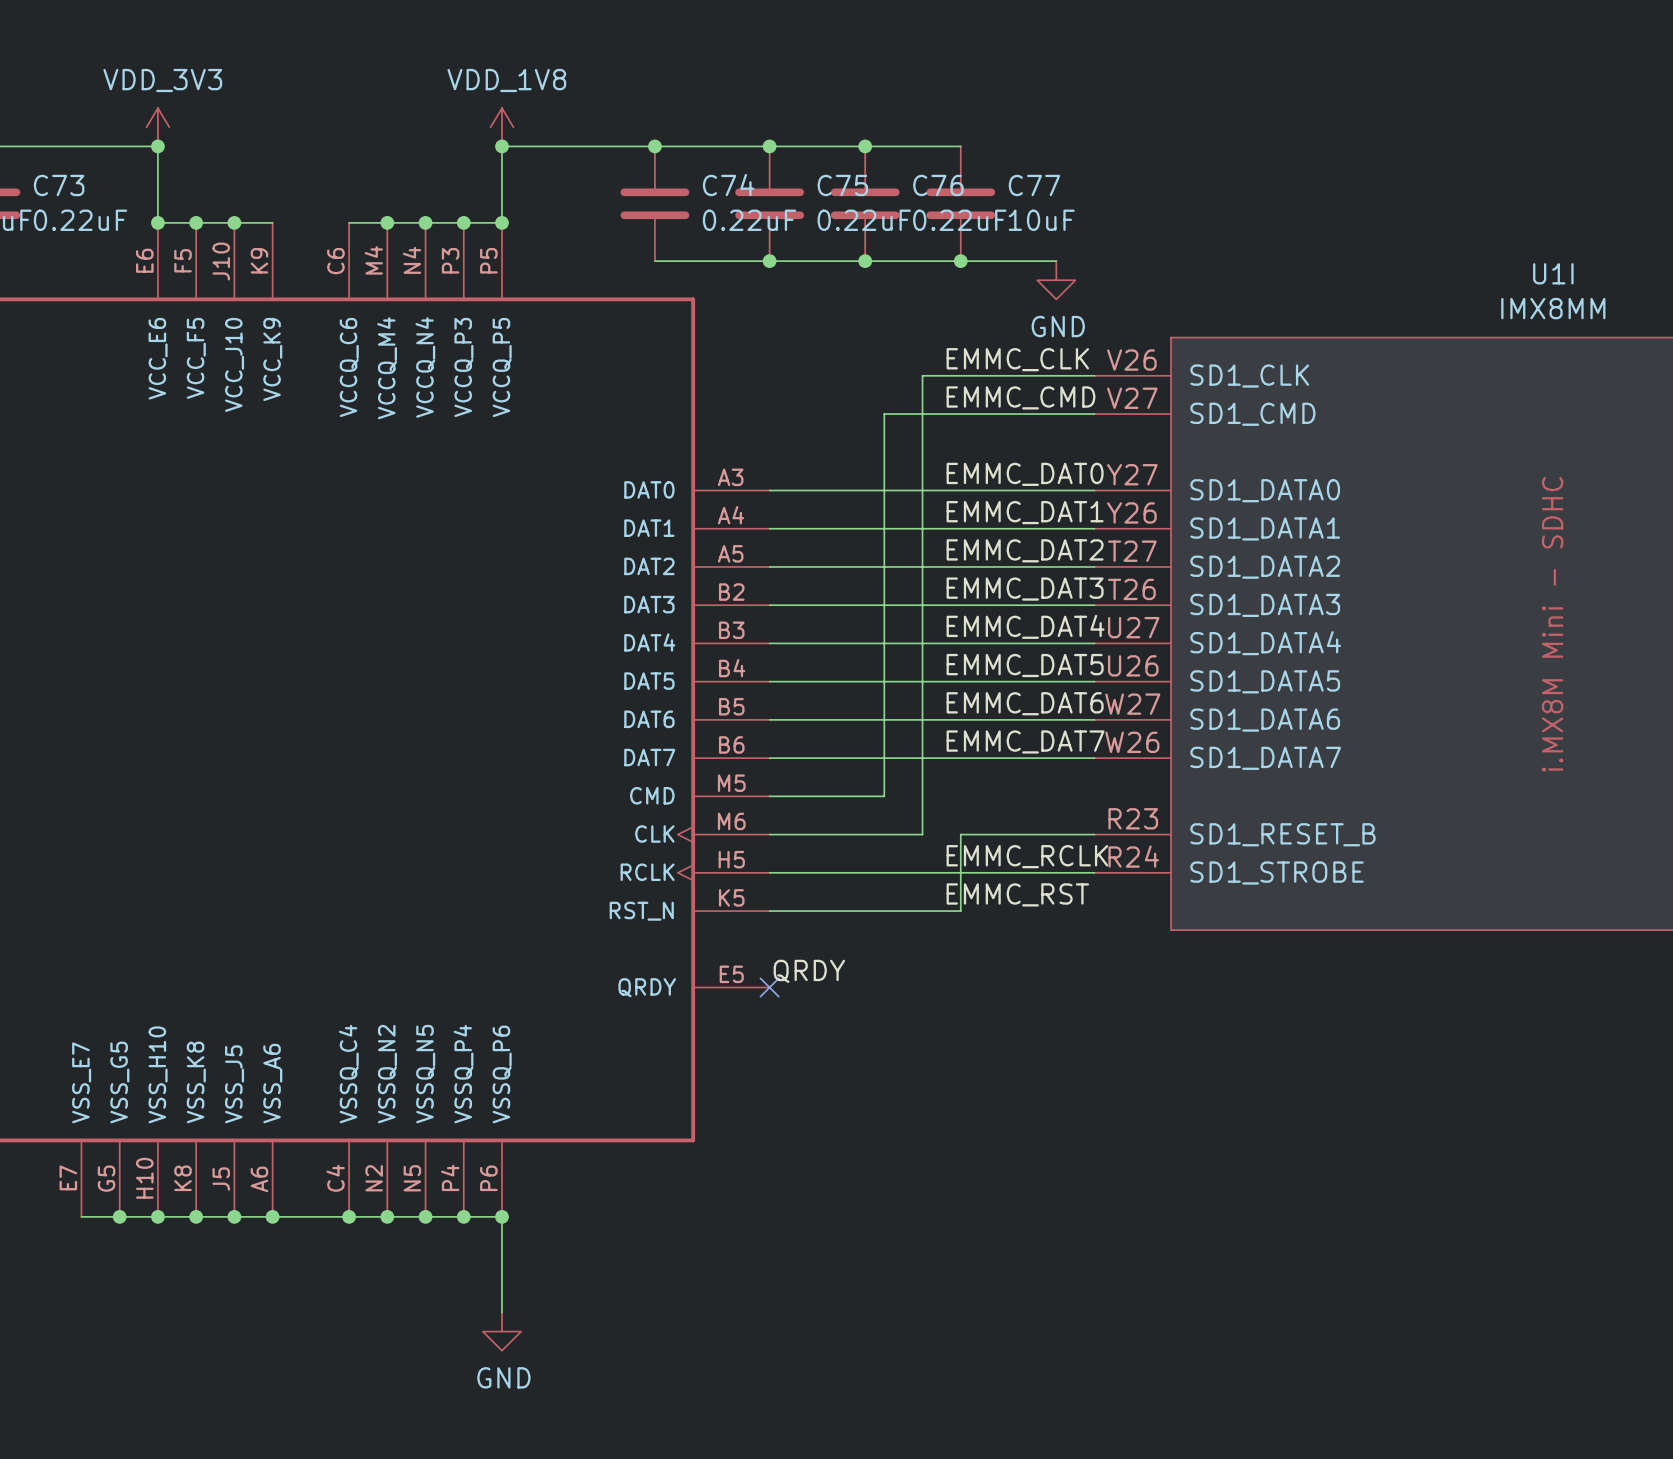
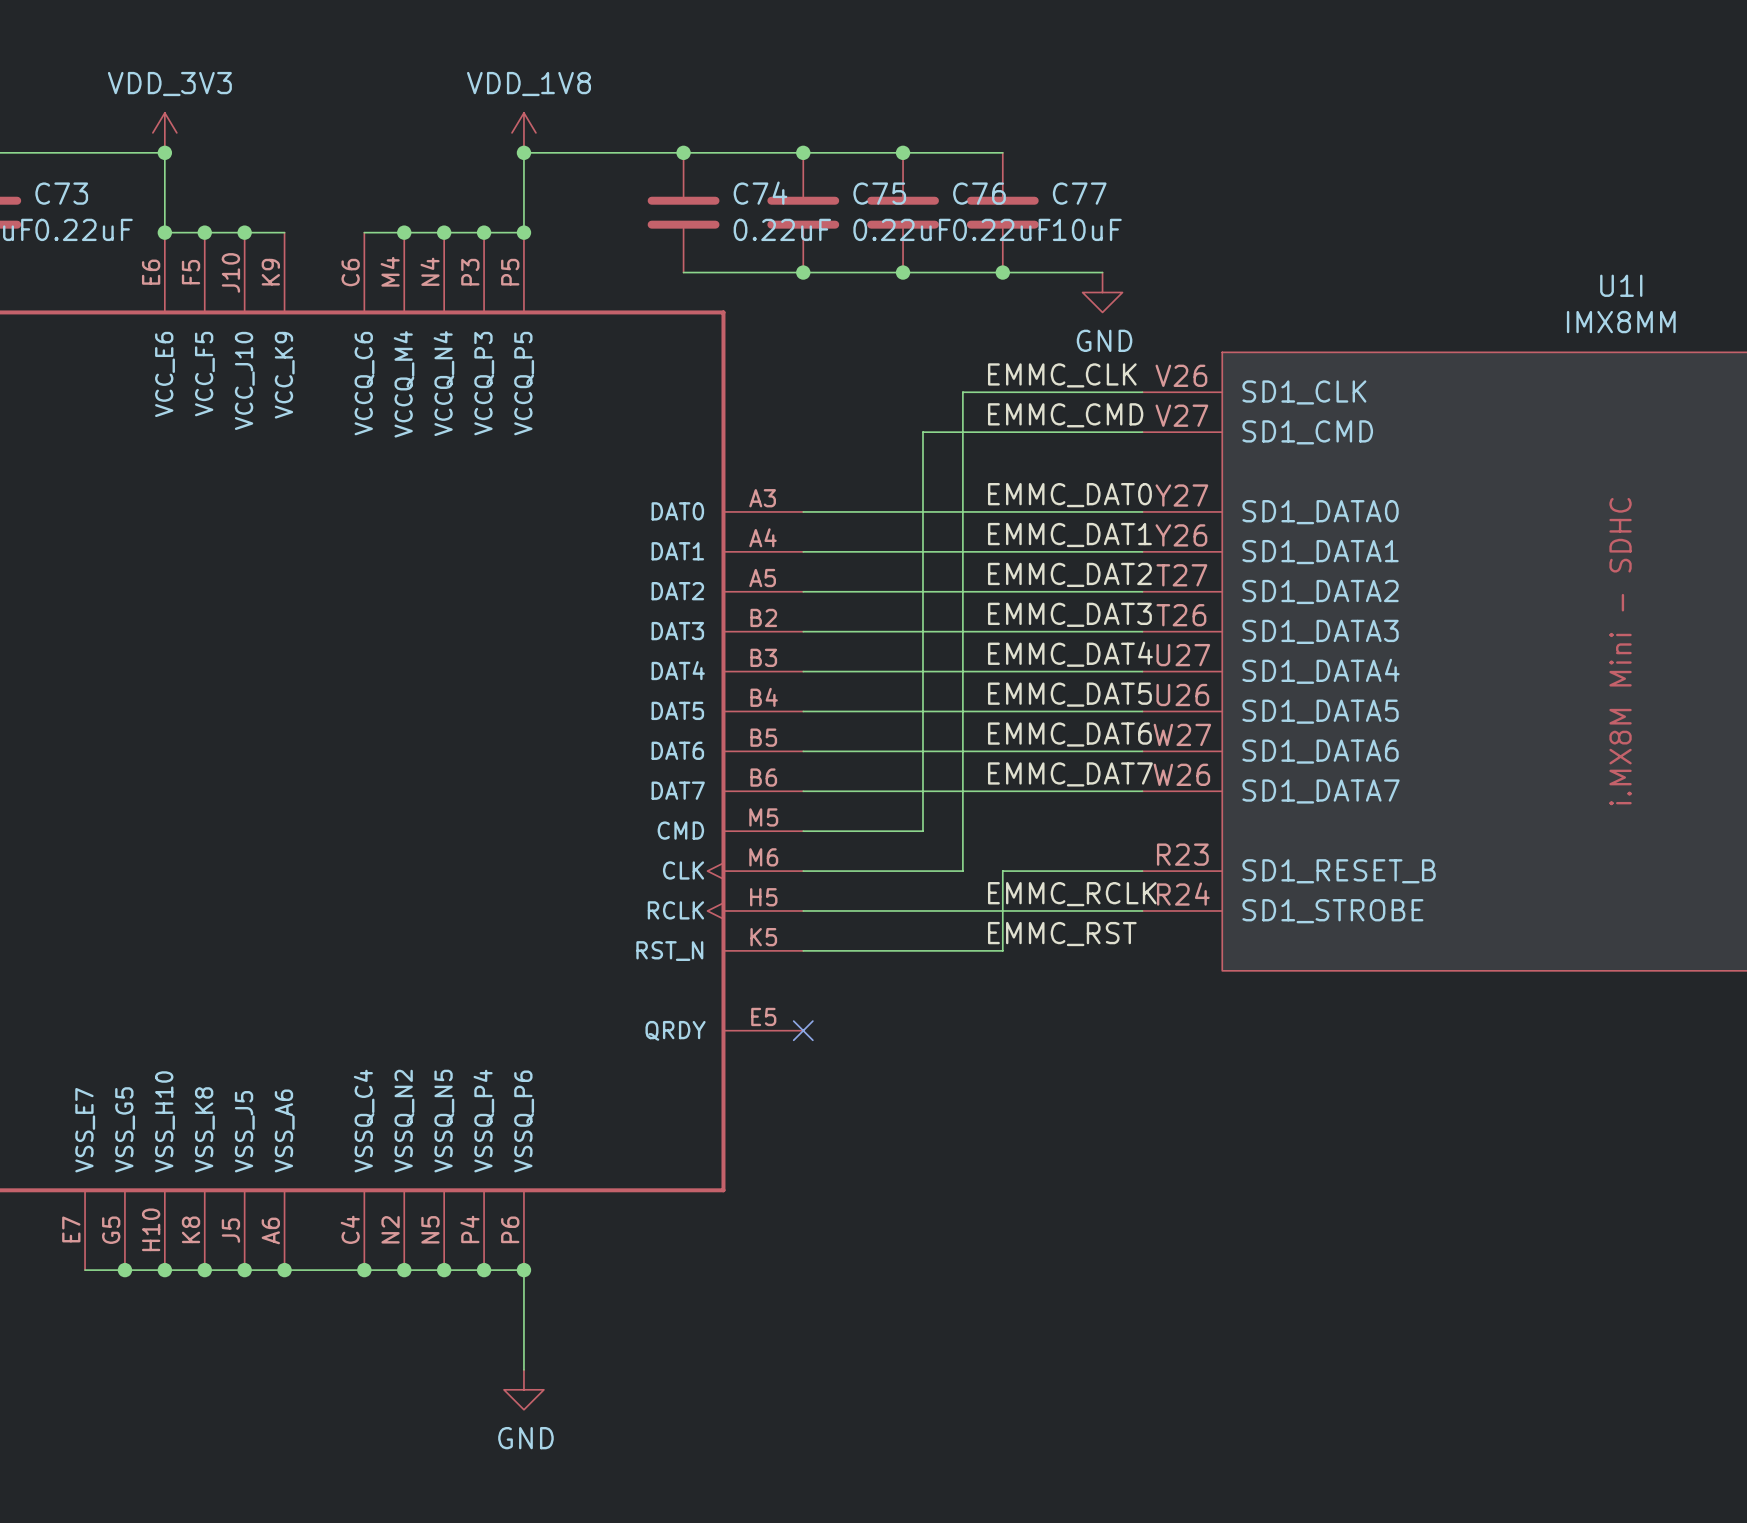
label: QRDY (809, 971) -> none

